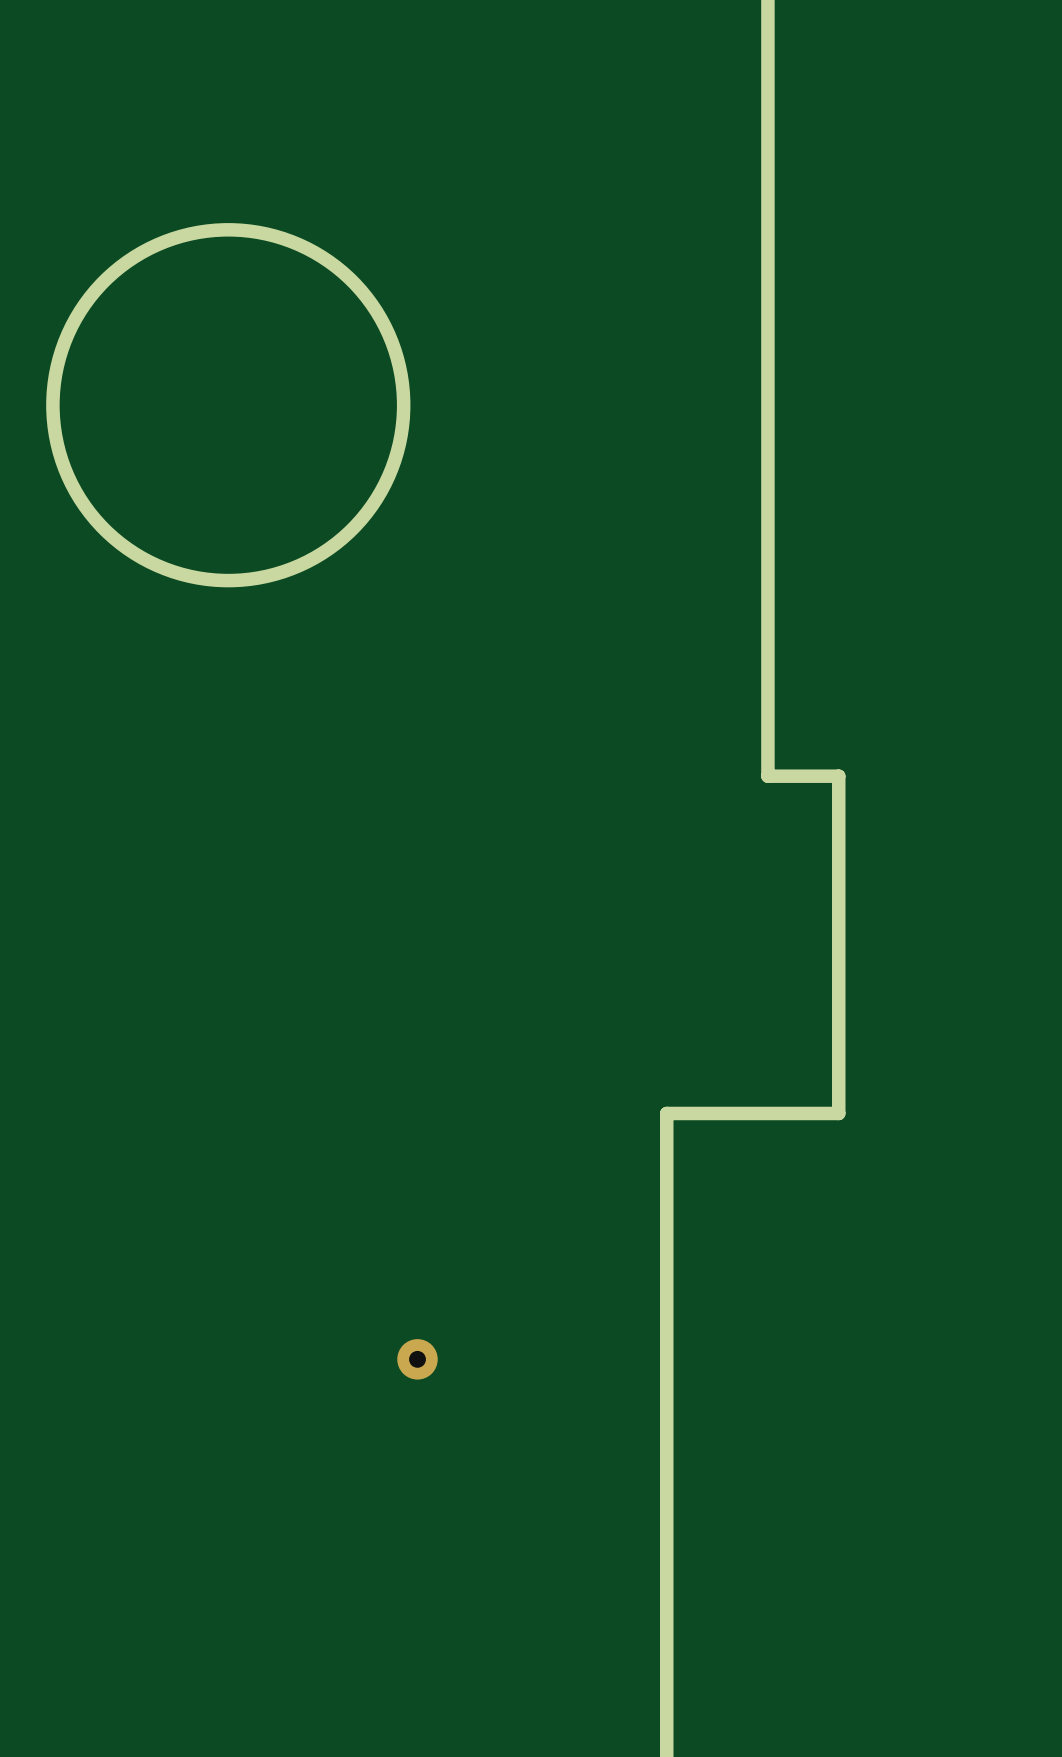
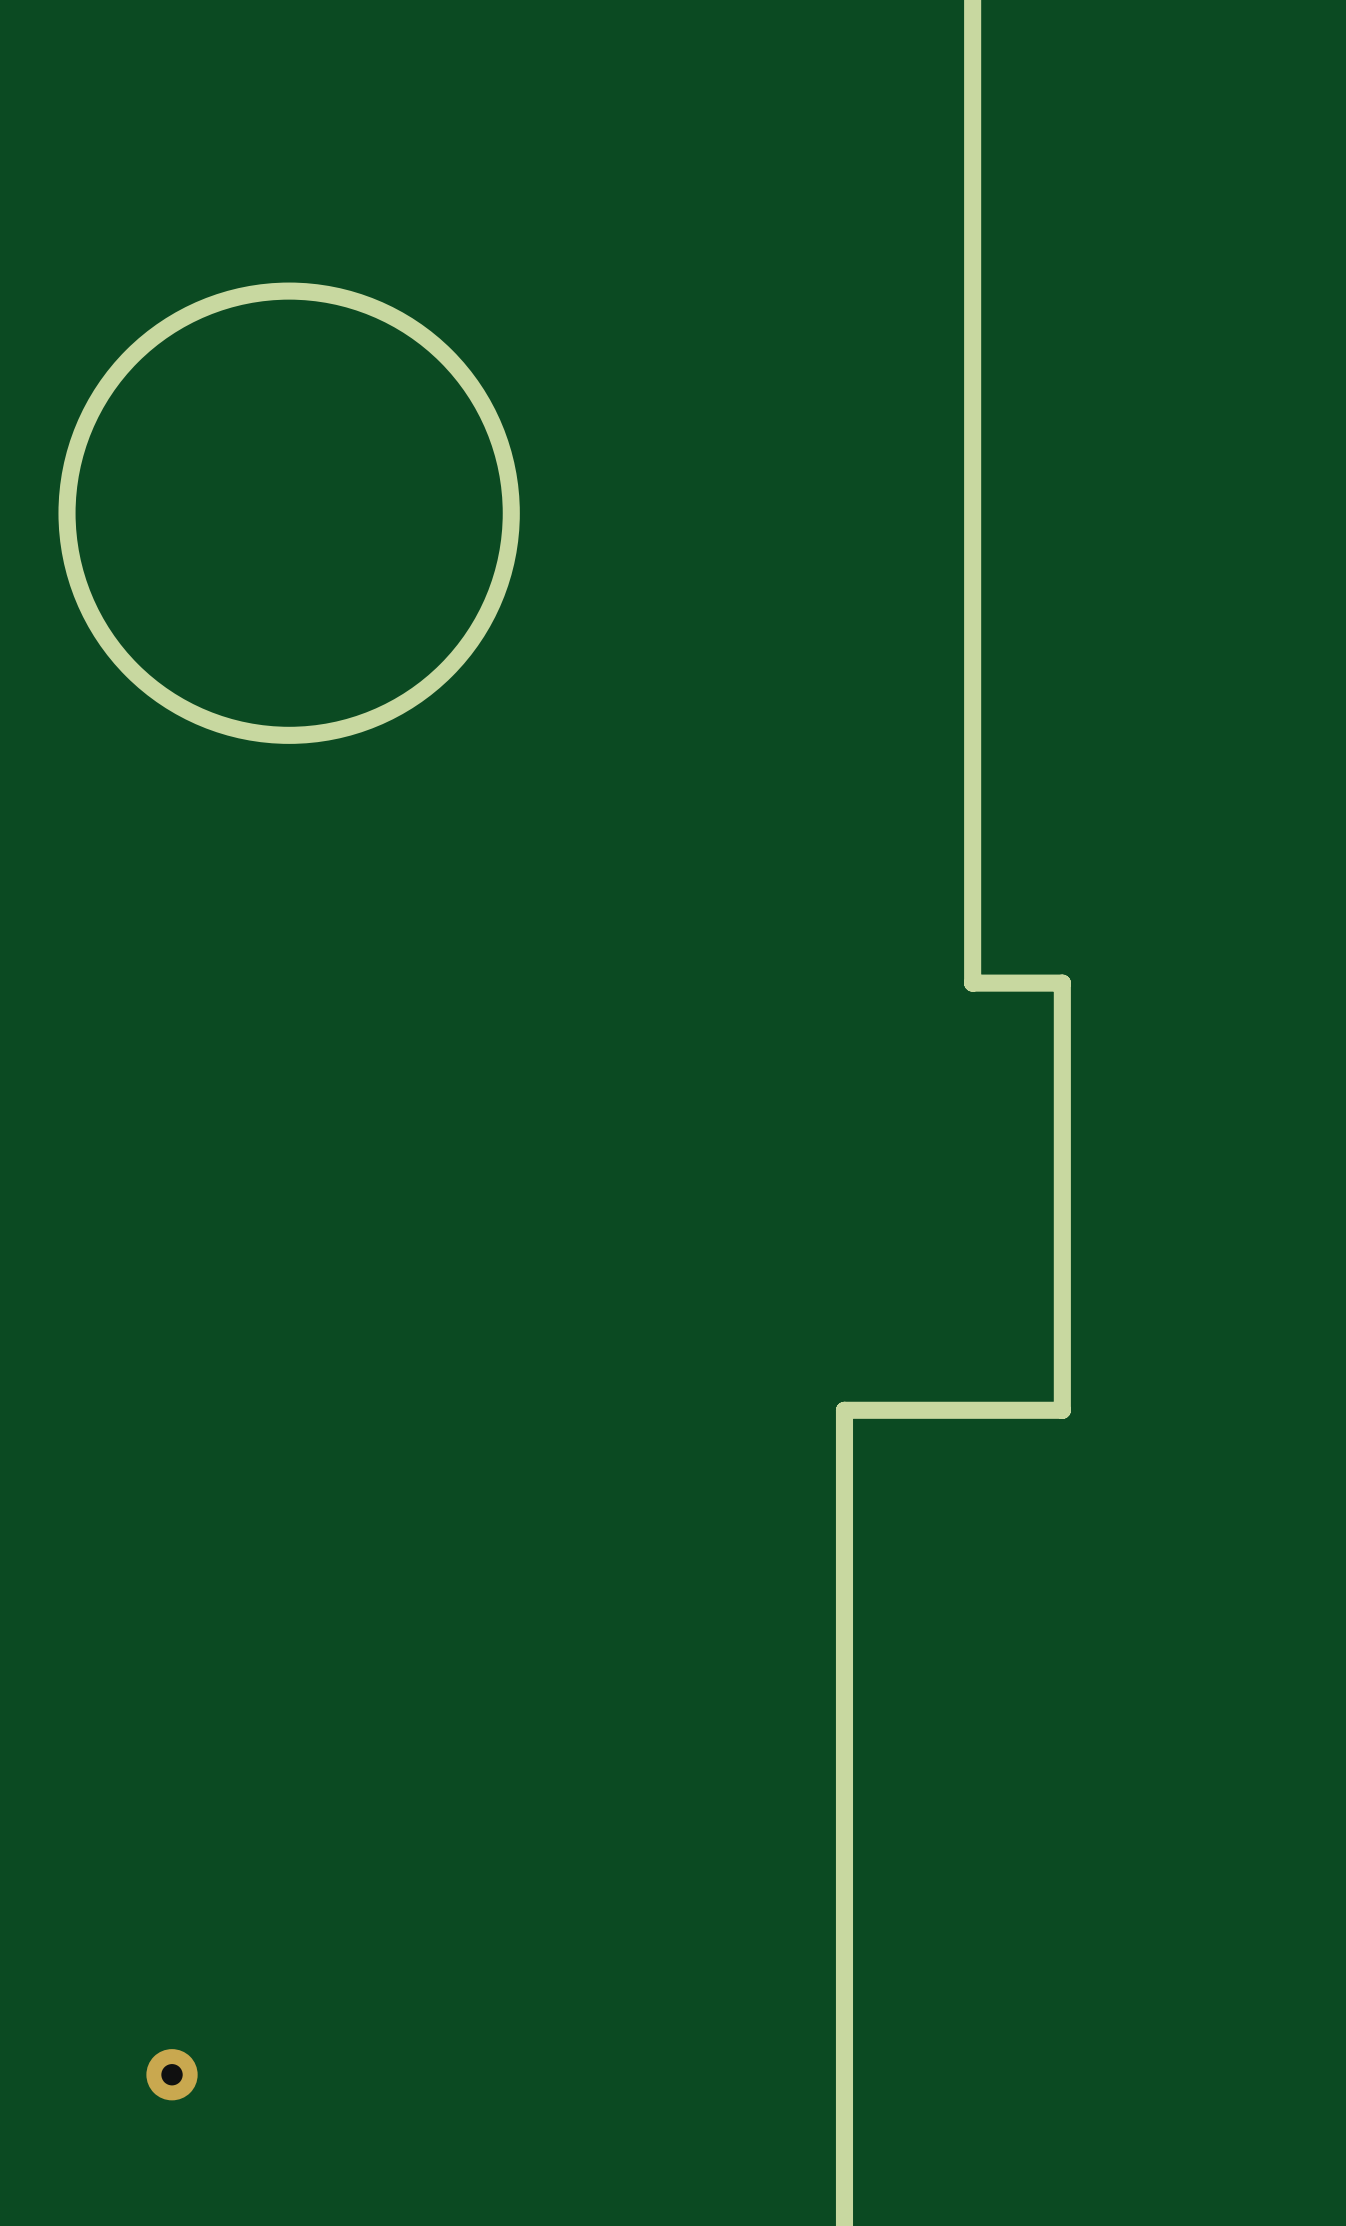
via position: (417, 1359) -> (172, 2074)

